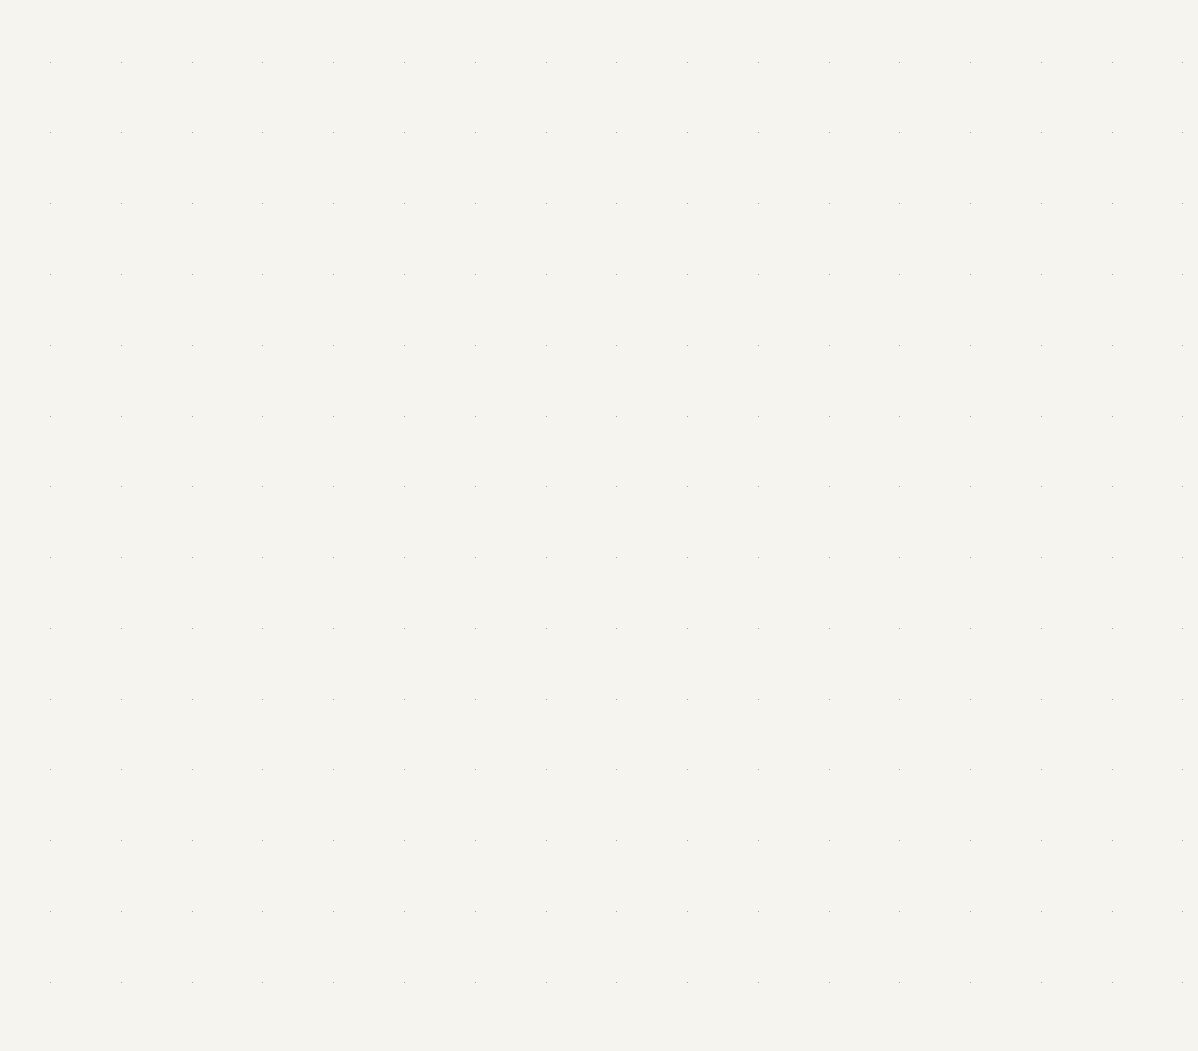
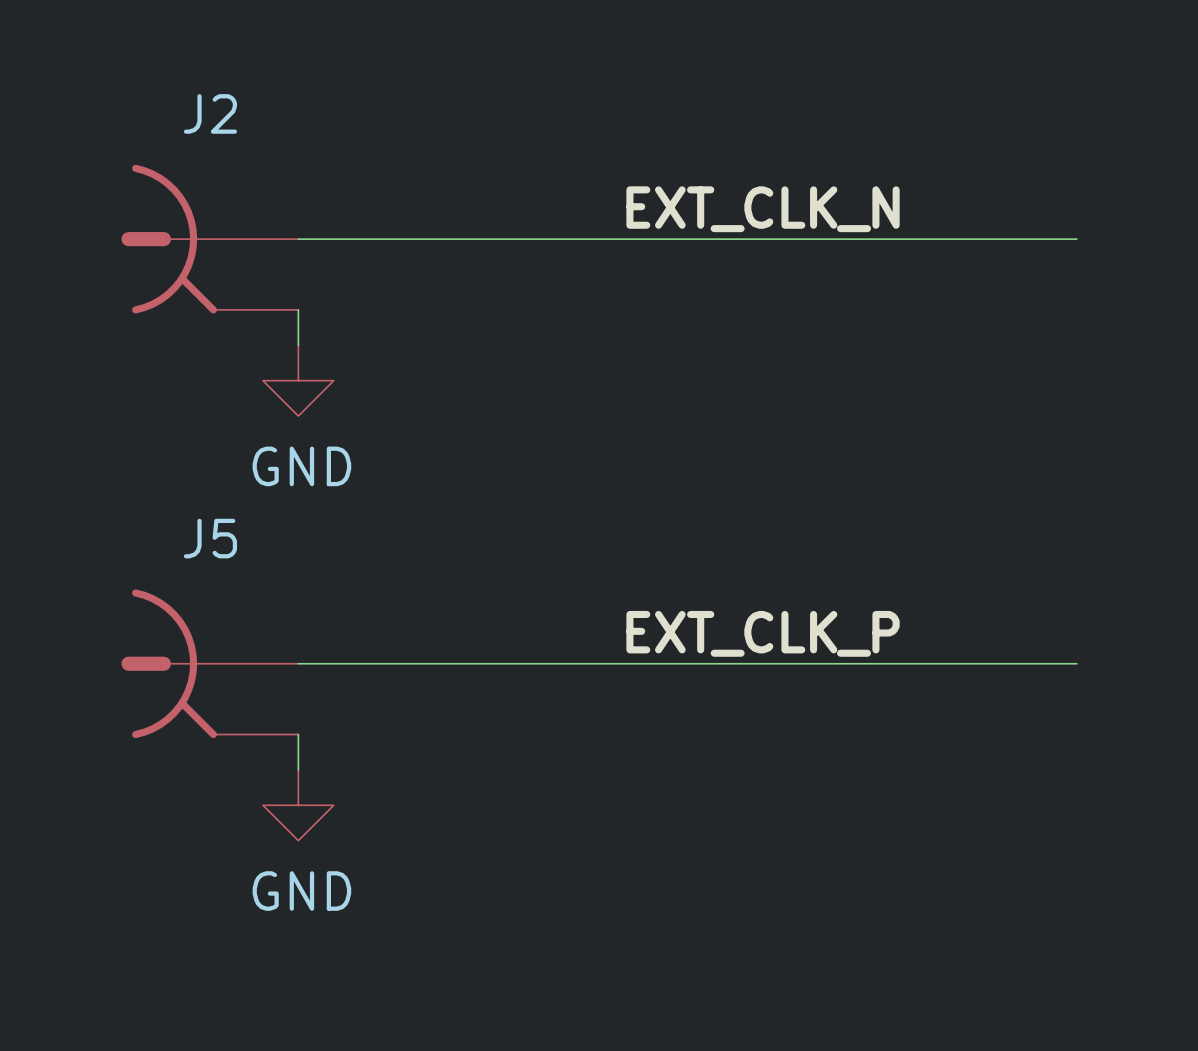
label: none -> EXT_CLK_N (763, 209)
J2: none -> (209, 239)
wire: none -> (298, 239) (1076, 239)
wire: none -> (298, 309) (298, 345)
power symbol: none -> GND (298, 380)
label: none -> EXT_CLK_P (763, 633)
J5: none -> (209, 663)
wire: none -> (298, 663) (1076, 663)
wire: none -> (298, 734) (298, 769)
power symbol: none -> GND (298, 805)

